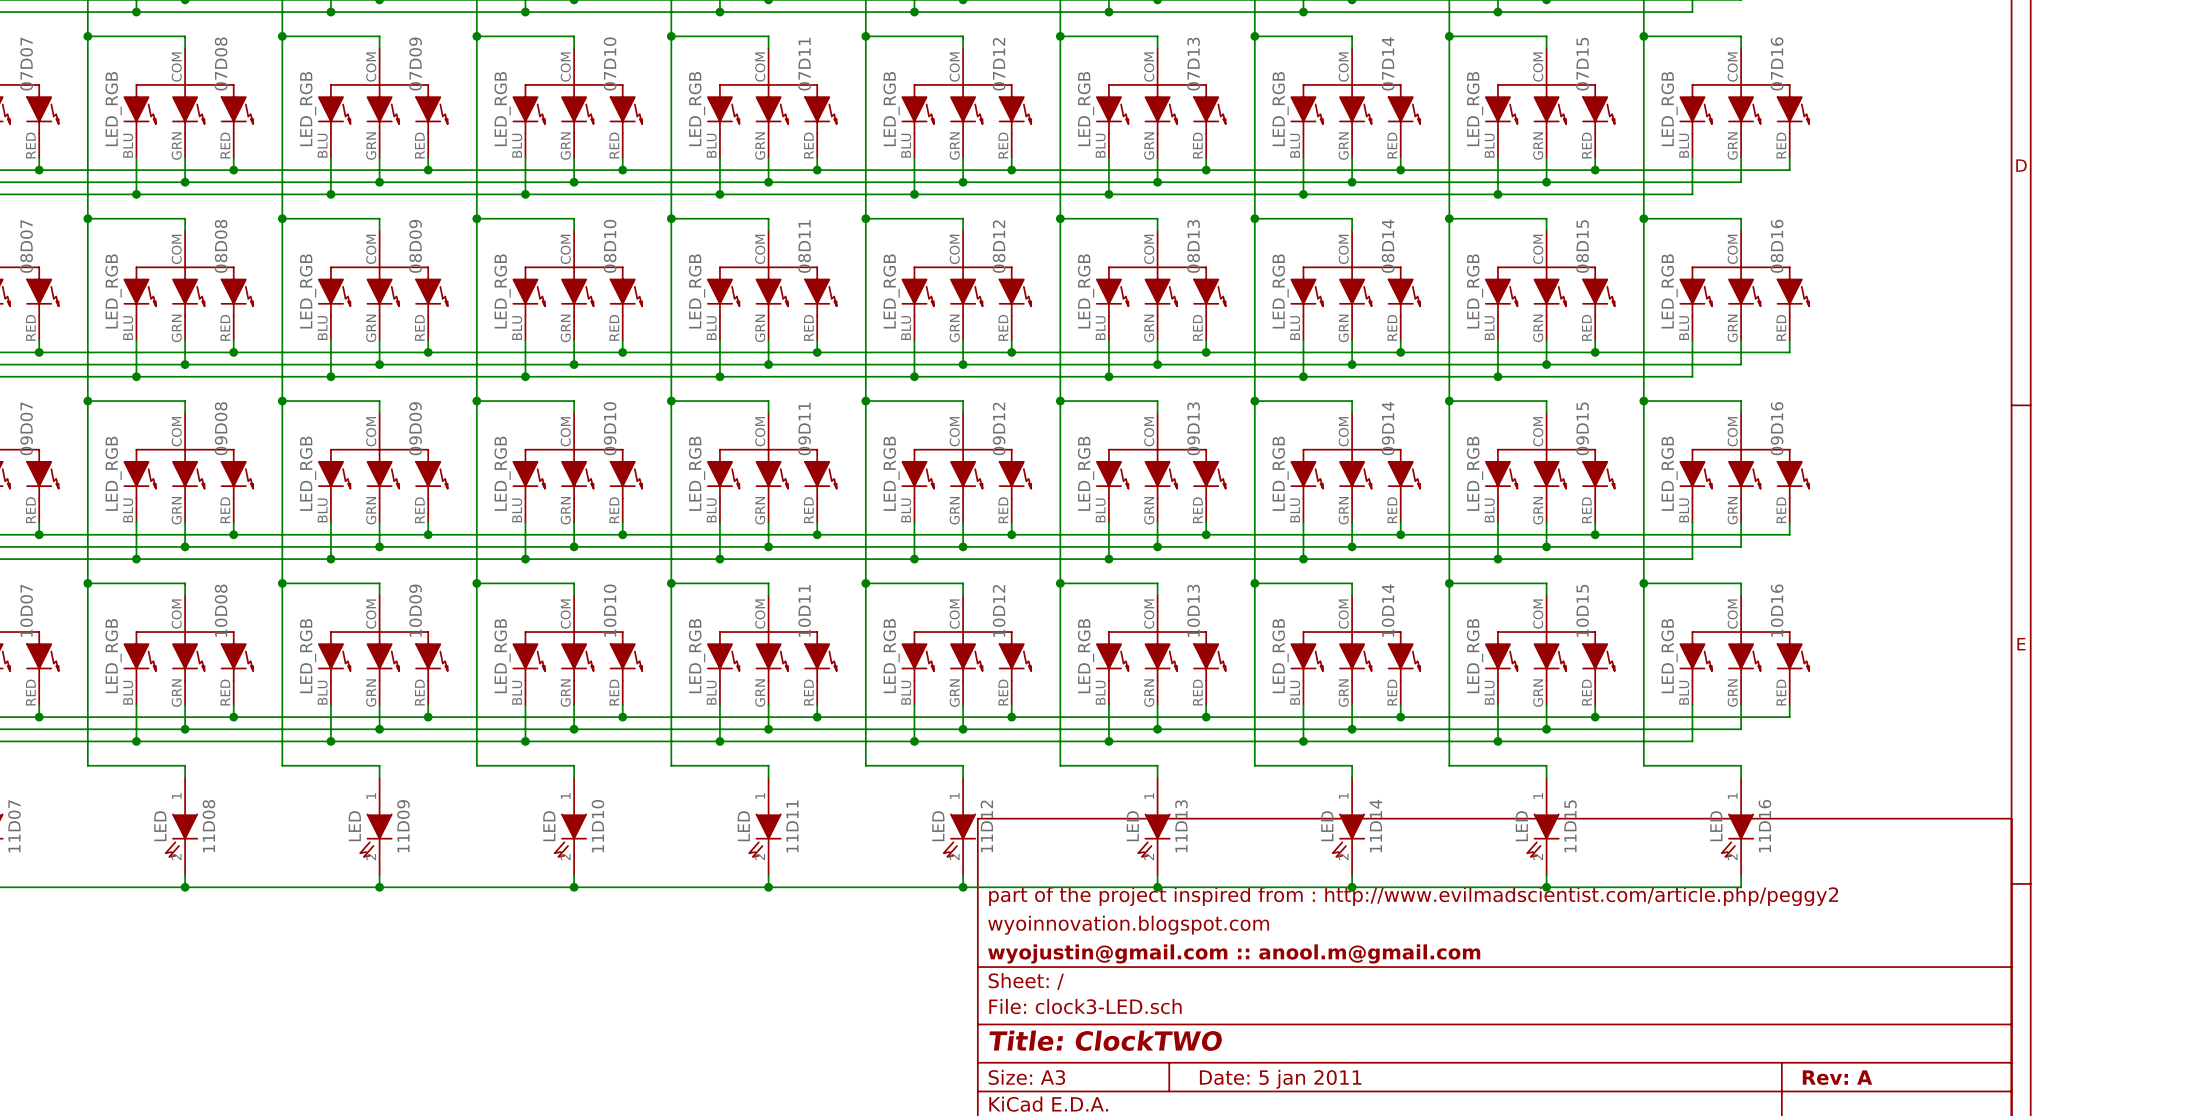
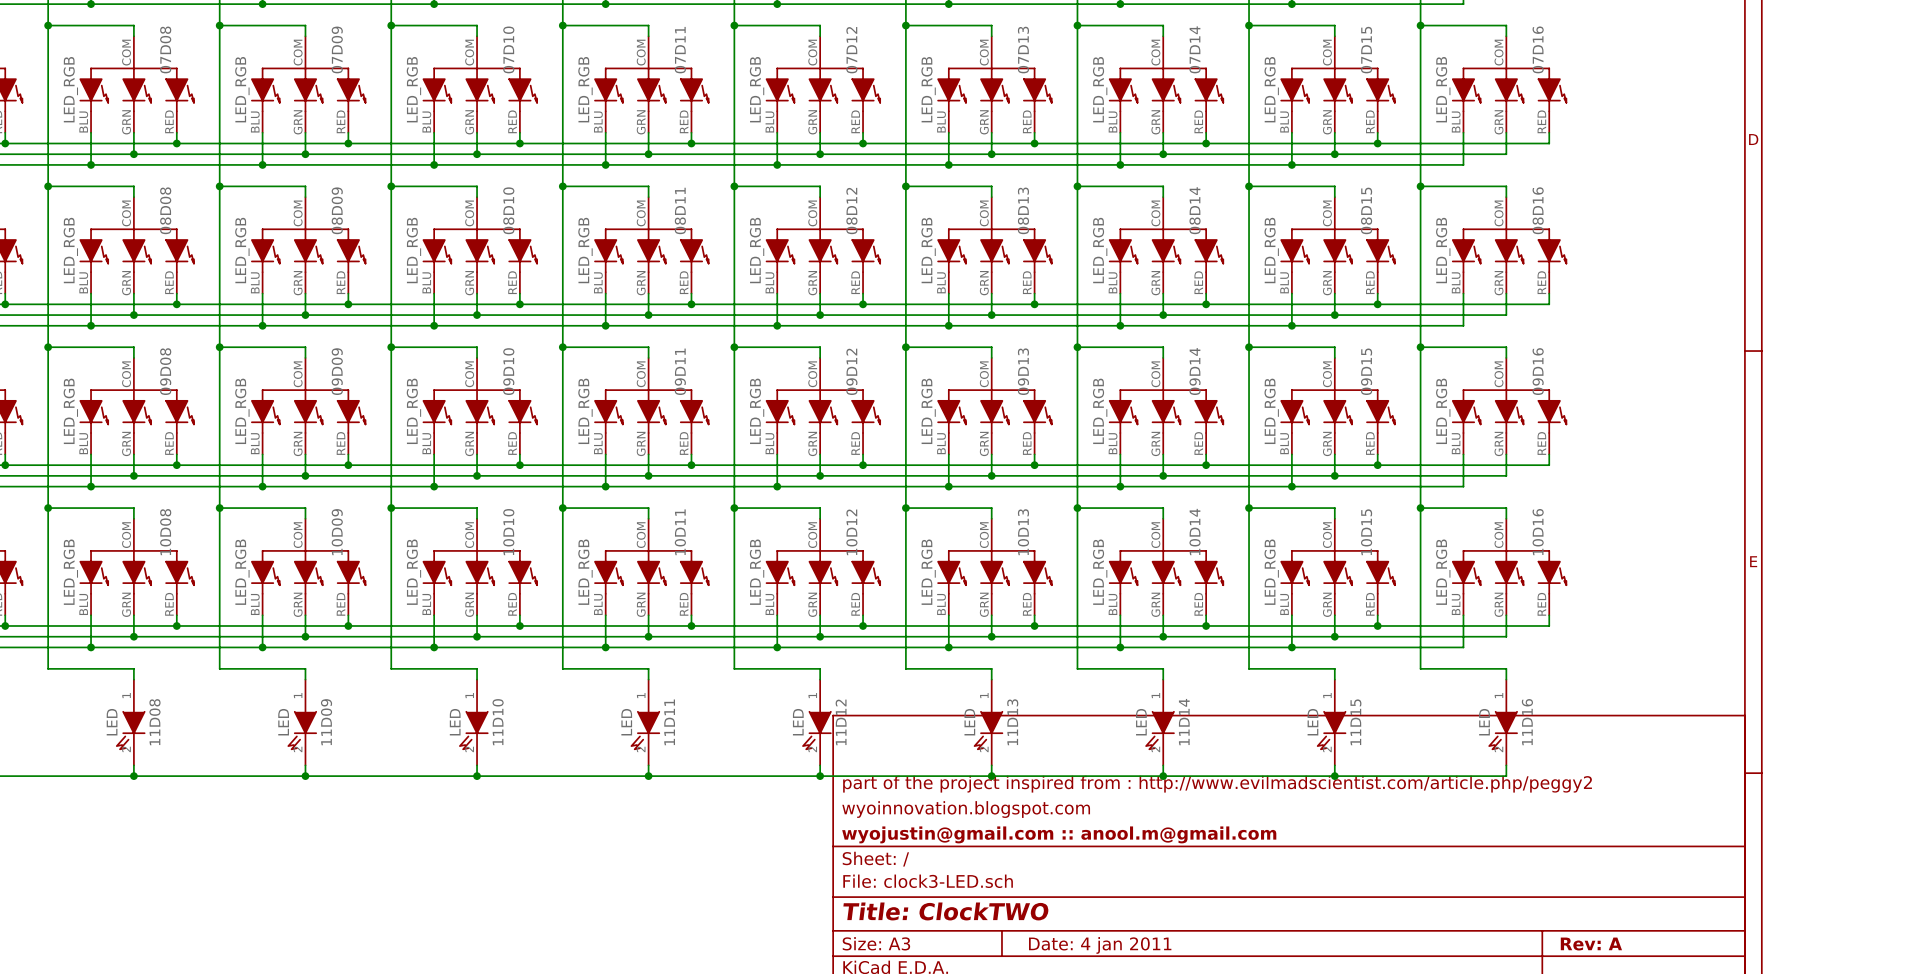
title block: Date: 5 jan 2011 (1280, 1079) -> Date: 4 jan 2011 (1100, 945)

